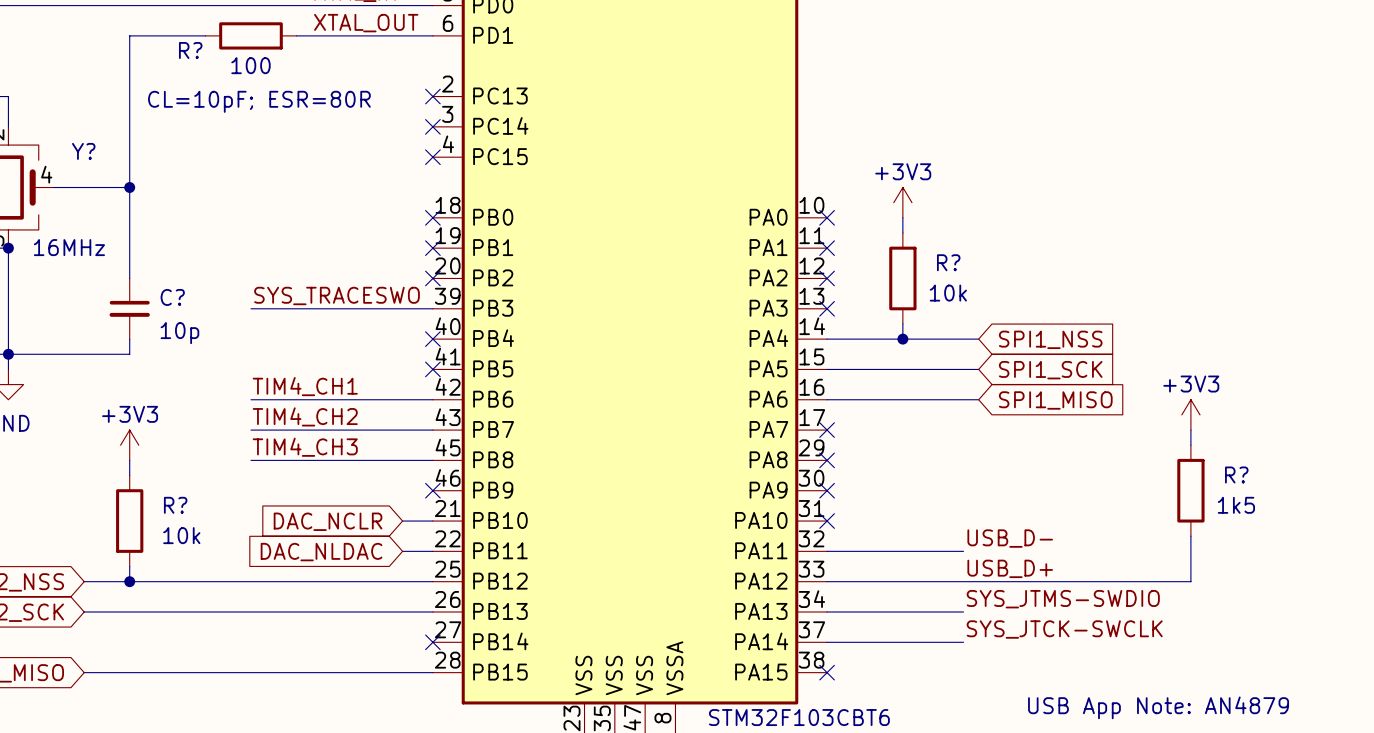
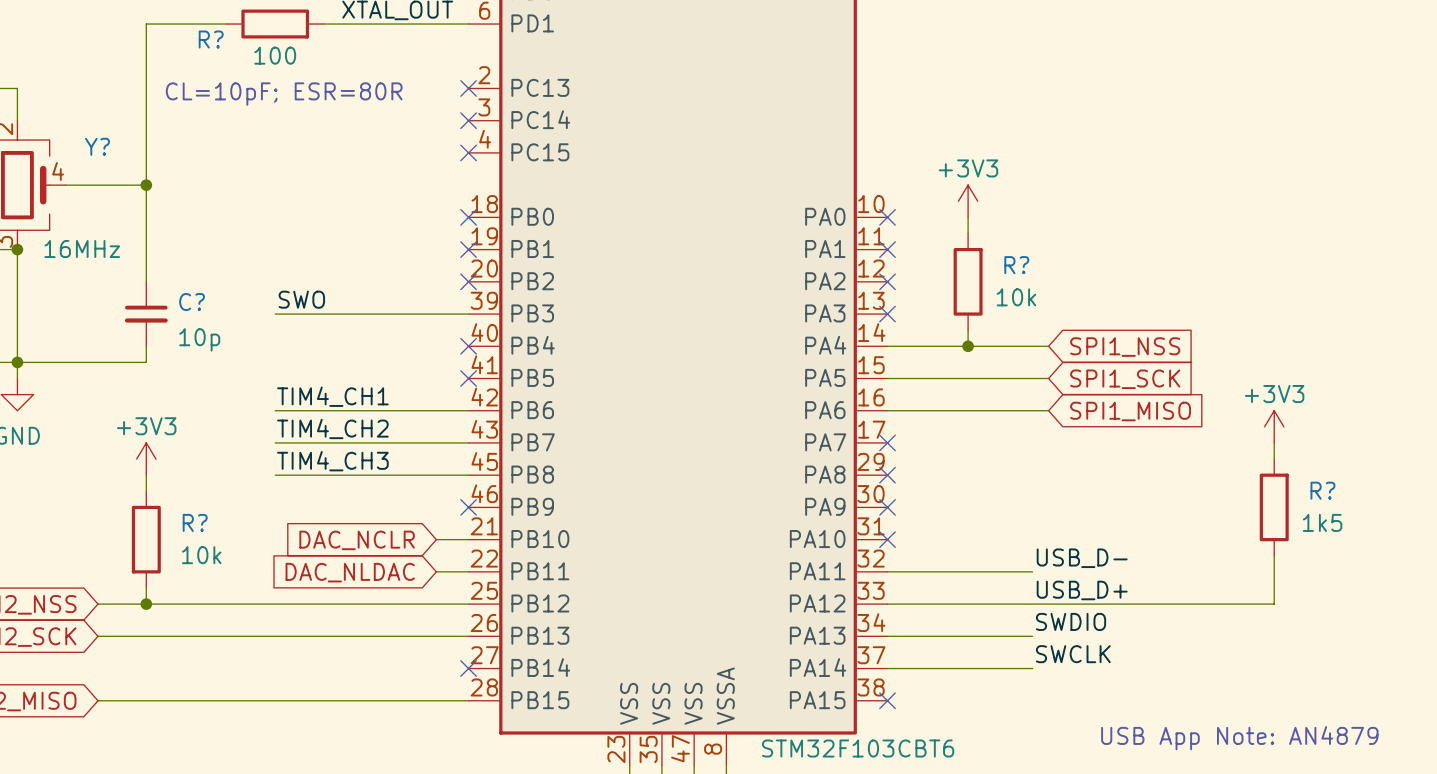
label: SYS_TRACESWO (337, 295) -> SWO (301, 299)
label: SYS_JTMS-SWDIO (1063, 599) -> SWDIO (1071, 621)
label: SYS_JTCK-SWCLK (1064, 629) -> SWCLK (1073, 654)

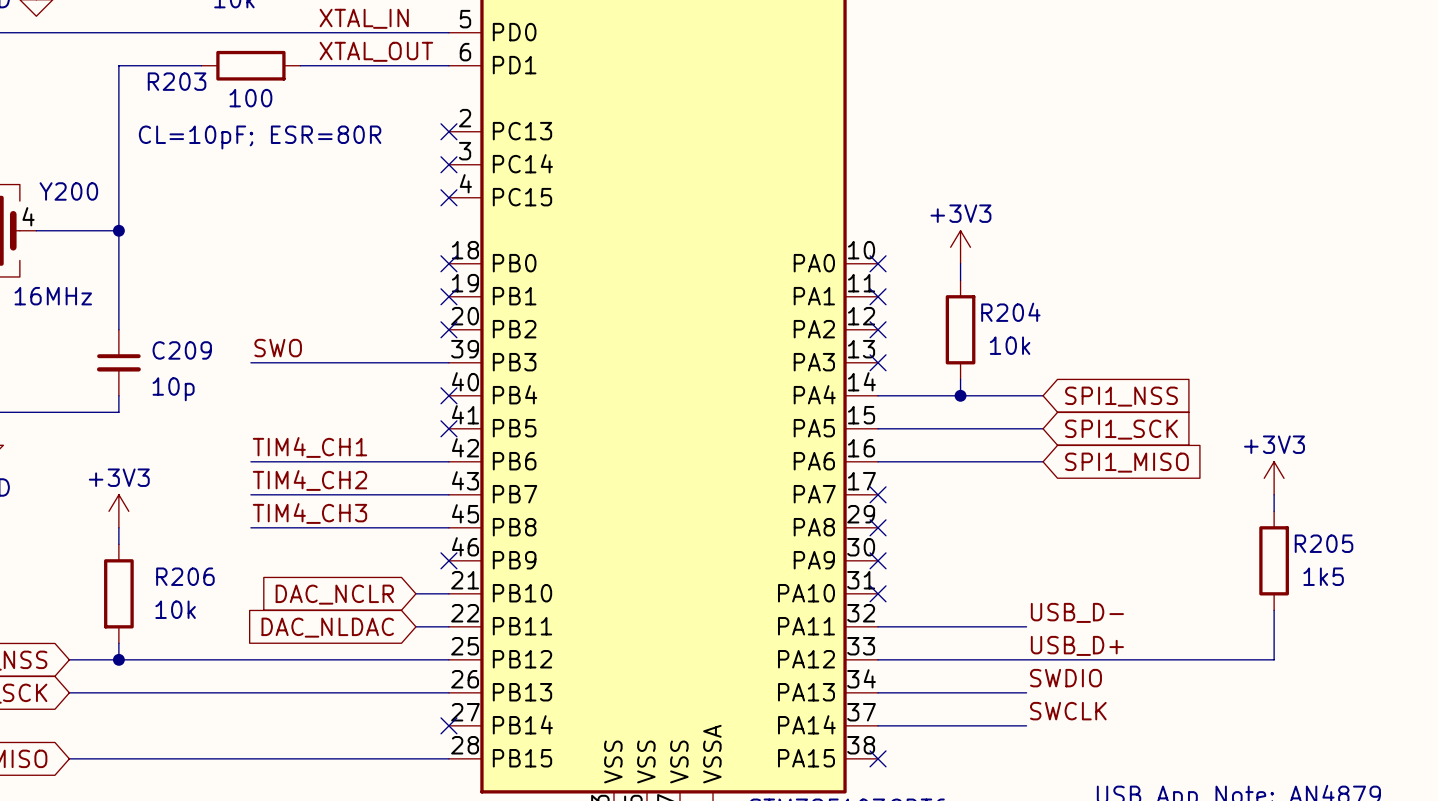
R? name: R? (211, 39) -> R203 (177, 81)
Y? name: Y? (97, 146) -> Y200 (68, 191)
R? name: R? (1016, 265) -> R204 (1010, 312)
C? name: C? (192, 302) -> C209 (182, 350)
R? name: R? (1322, 490) -> R205 (1324, 543)
R? name: R? (195, 522) -> R206 (185, 576)

